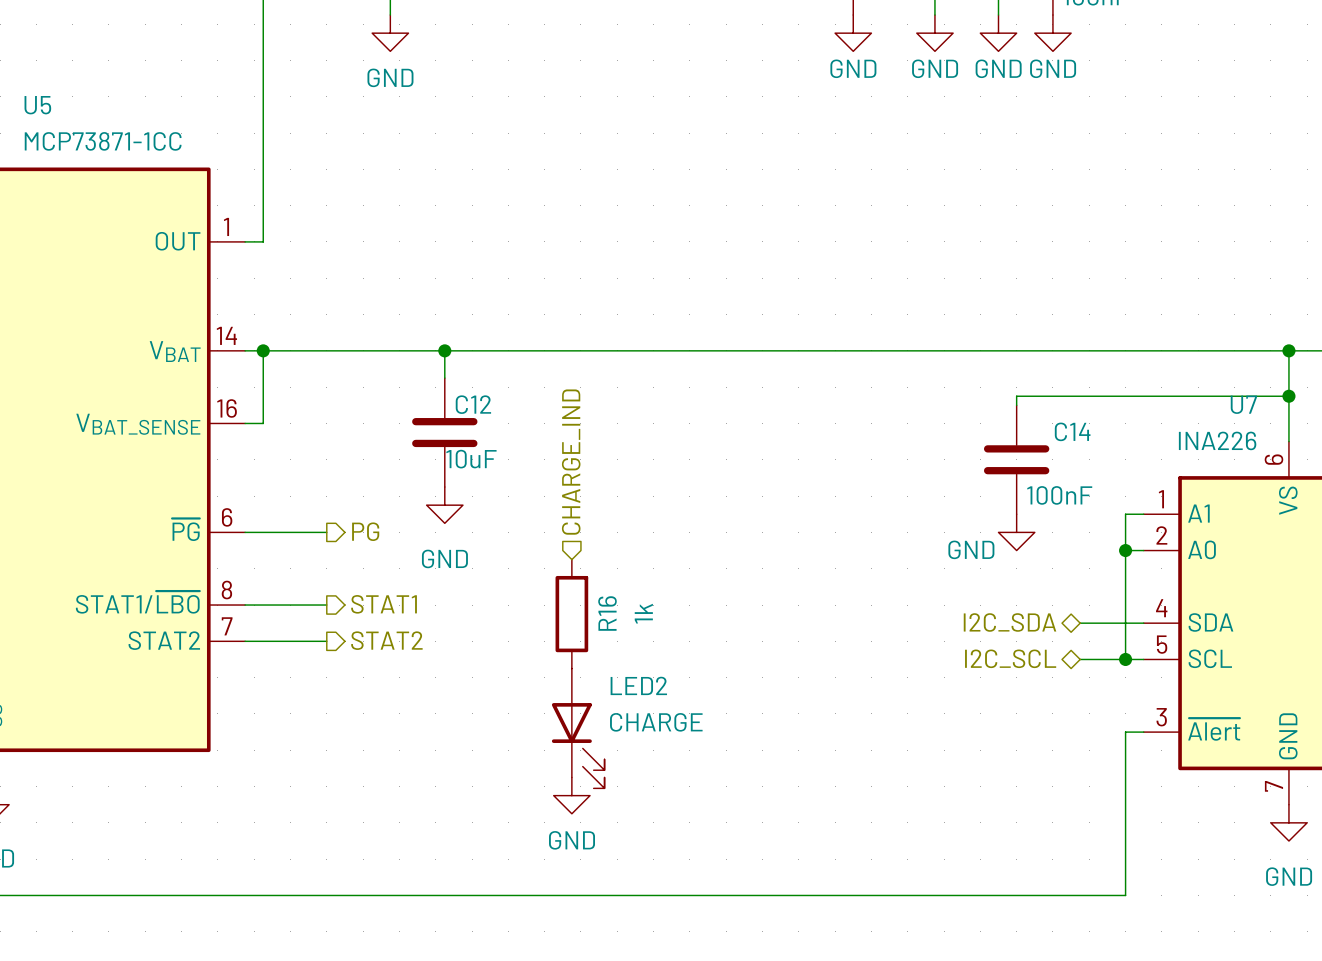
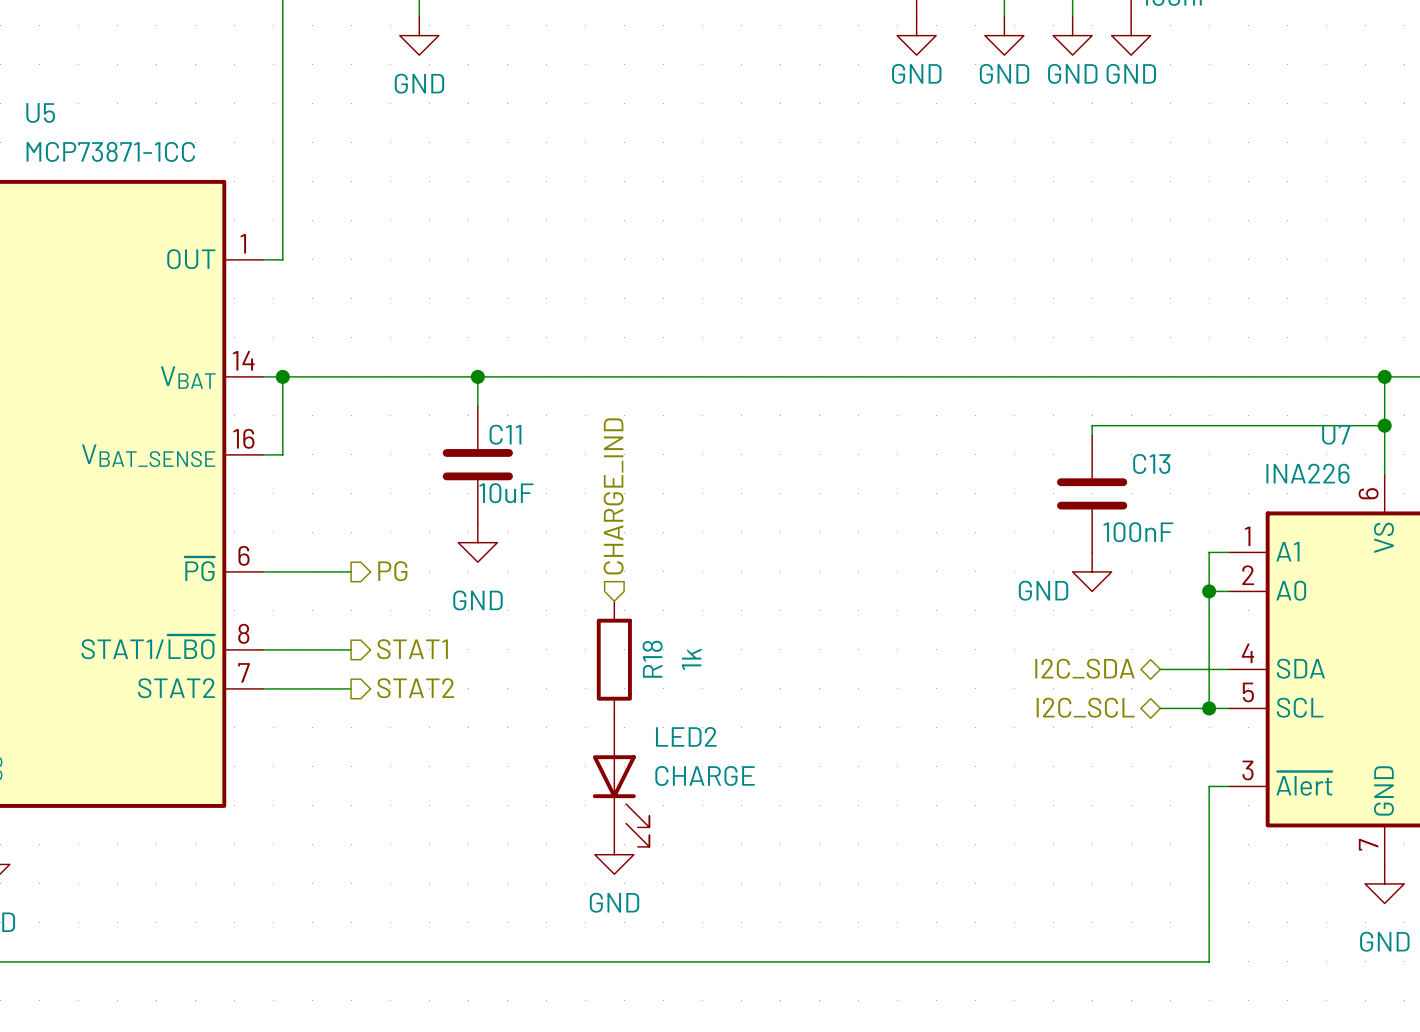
C12 name: C12 (473, 404) -> C11 (505, 434)
C14 name: C14 (1072, 431) -> C13 (1151, 463)
R16 name: R16 (607, 613) -> R18 (652, 659)

